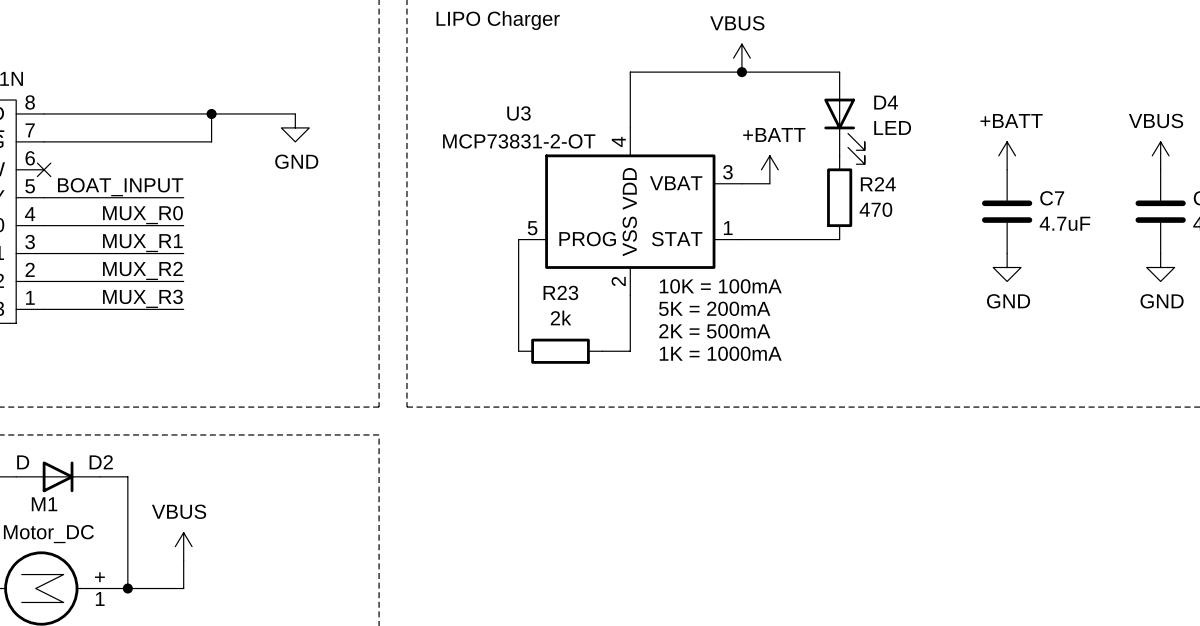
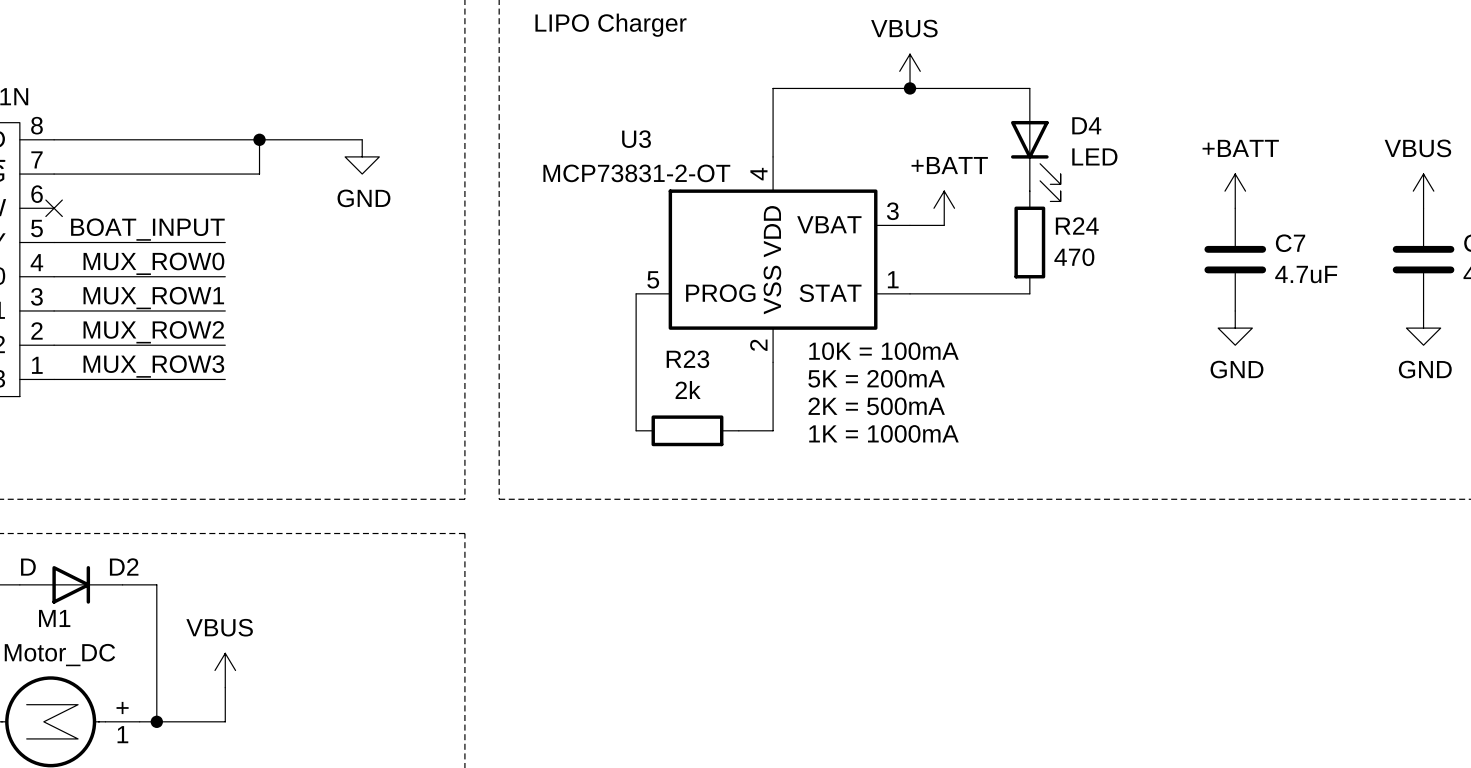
label: MUX_R0 (142, 215) -> MUX_ROW0 (153, 263)
label: MUX_R1 (142, 243) -> MUX_ROW1 (153, 298)
label: MUX_R2 (142, 270) -> MUX_ROW2 (153, 332)
label: MUX_R3 (142, 298) -> MUX_ROW3 (153, 366)

